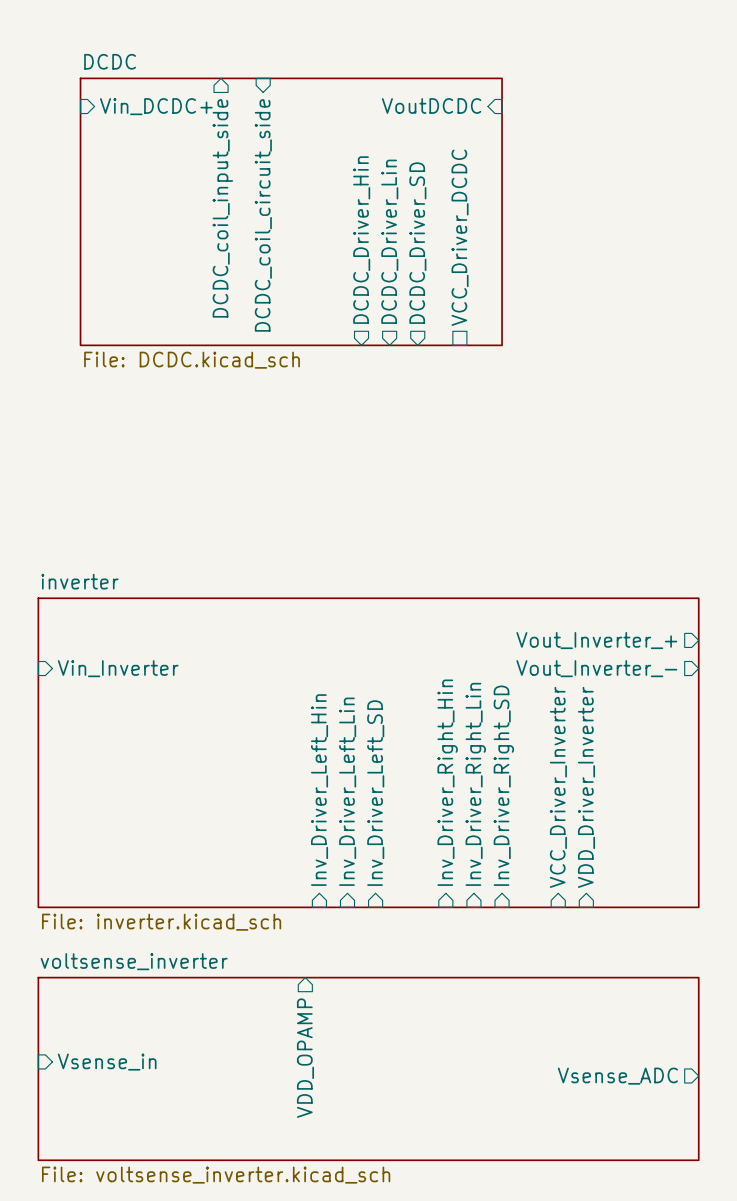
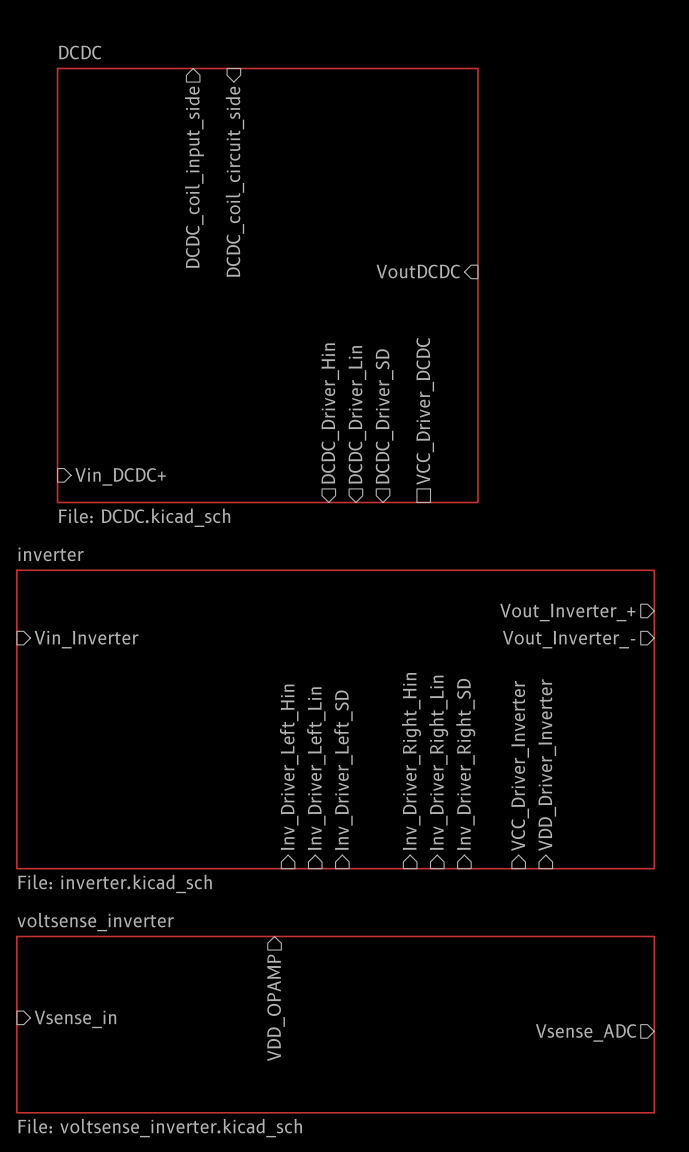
sheet pin position: VoutDCDC (431, 105) -> VoutDCDC (418, 271)
sheet pin: Vin_DCDC+ (156, 106) -> none
sheet DCDC: File: DCDC.kicad_sch (291, 211) -> none
sheet pin position: VCC_Driver_DCDC (460, 237) -> VCC_Driver_DCDC (425, 411)
sheet pin position: DCDC_Driver_Hin (361, 240) -> DCDC_Driver_Hin (330, 413)
sheet pin position: DCDC_Driver_Lin (389, 241) -> DCDC_Driver_Lin (357, 414)
sheet pin position: DCDC_Driver_SD (417, 243) -> DCDC_Driver_SD (384, 416)
sheet DCDC: none -> File: DCDC.kicad_sch (267, 285)
sheet pin: none -> Vin_DCDC+ (120, 476)

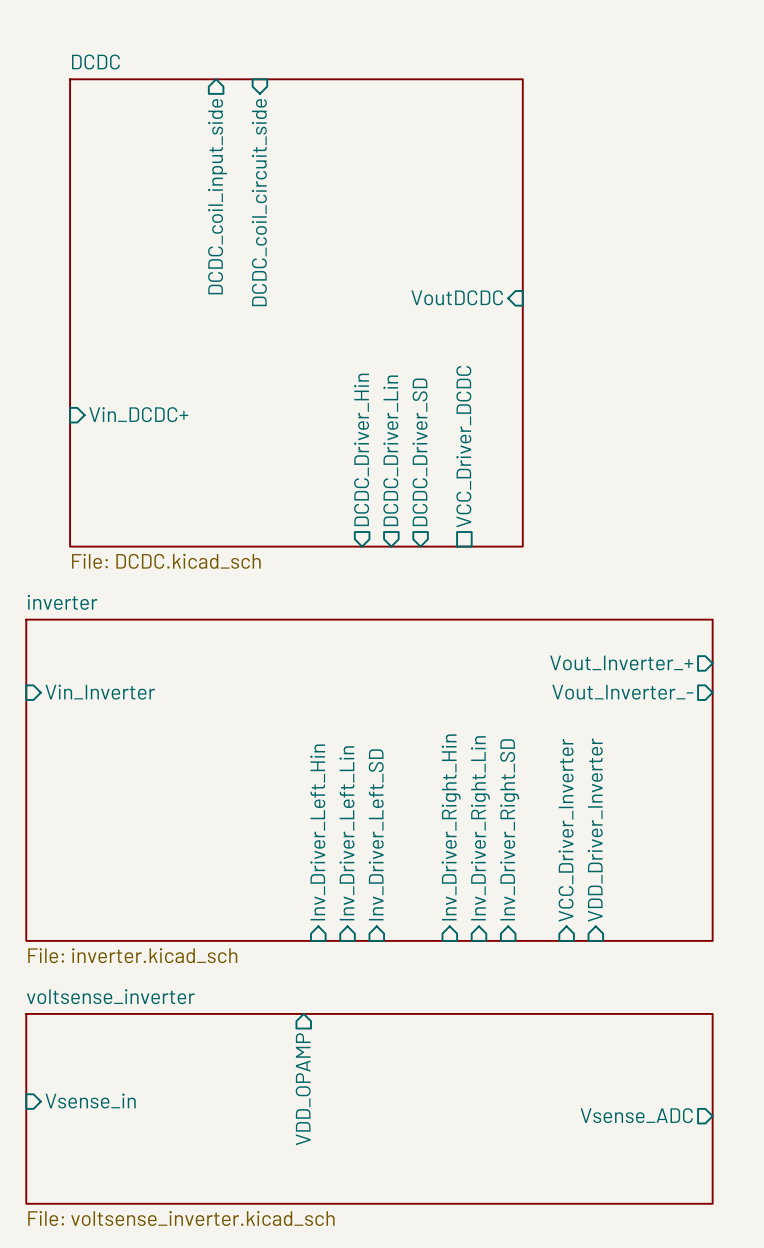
sheet pin position: Vin_DCDC+ (120, 476) -> Vin_DCDC+ (138, 414)

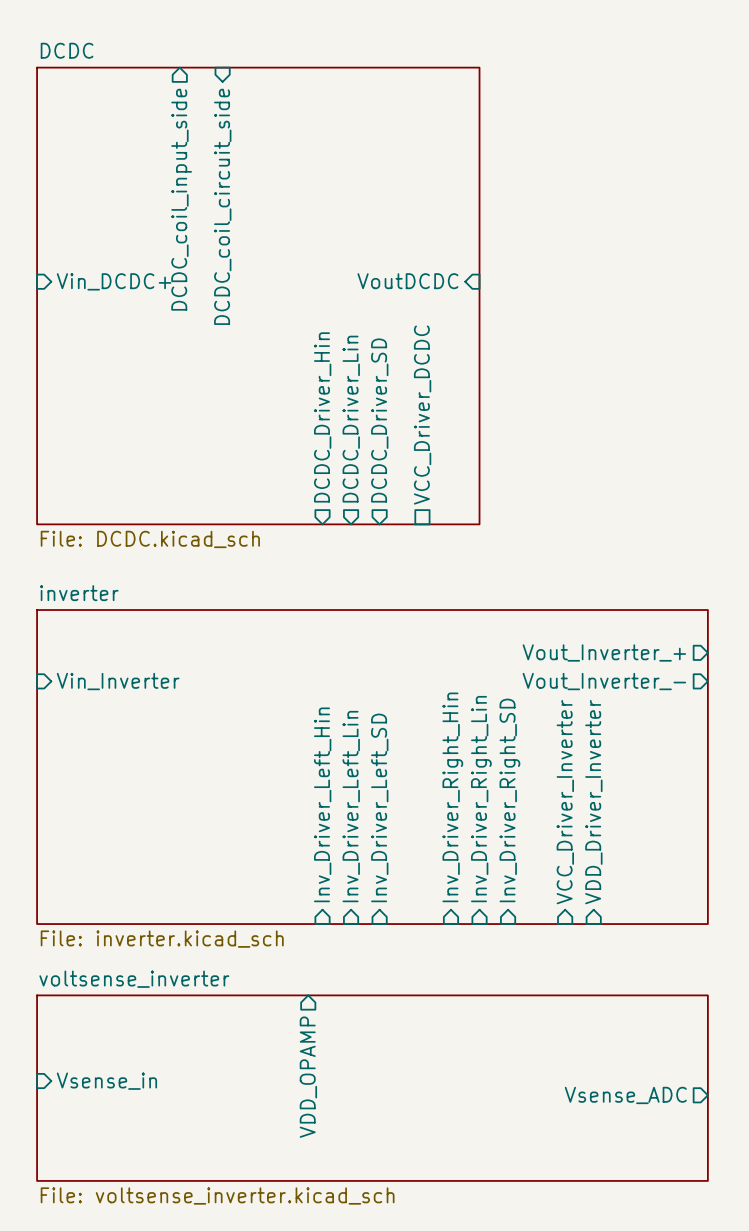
sheet pin position: DCDC_coil_input_side (217, 196) -> DCDC_coil_input_side (181, 199)
sheet pin position: DCDC_coil_circuit_side (259, 202) -> DCDC_coil_circuit_side (222, 206)
sheet pin position: VoutDCDC (457, 297) -> VoutDCDC (407, 281)
sheet DCDC position: (296, 312) -> (258, 295)
sheet pin position: Vin_DCDC+ (138, 414) -> Vin_DCDC+ (114, 281)
sheet pin position: VCC_Driver_DCDC (463, 446) -> VCC_Driver_DCDC (422, 415)
sheet pin position: DCDC_Driver_Hin (361, 449) -> DCDC_Driver_Hin (322, 417)
sheet pin position: DCDC_Driver_Lin (390, 450) -> DCDC_Driver_Lin (351, 419)
sheet pin position: DCDC_Driver_SD (420, 452) -> DCDC_Driver_SD (379, 420)

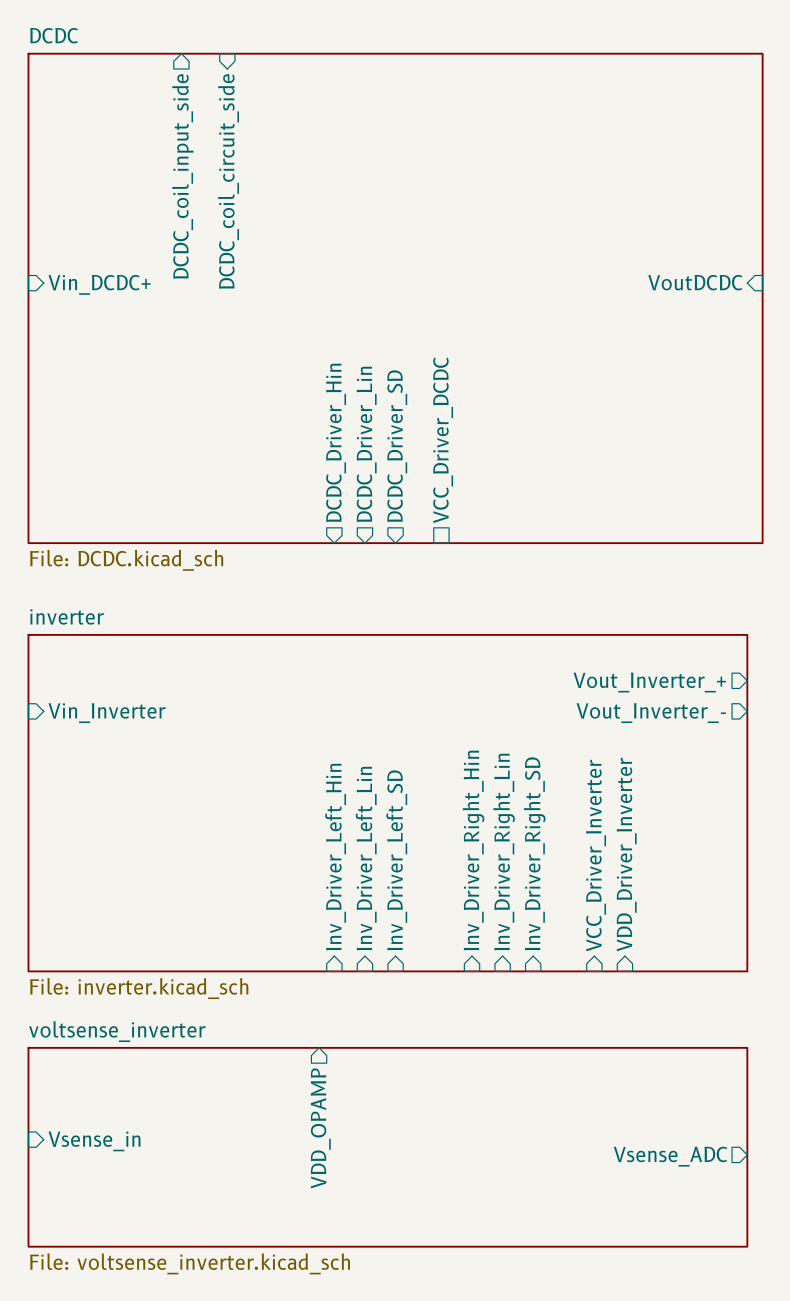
sheet pin position: VoutDCDC (407, 281) -> VoutDCDC (695, 282)
sheet DCDC: File: DCDC.kicad_sch (258, 295) -> none
sheet DCDC: none -> File: DCDC.kicad_sch (395, 298)

